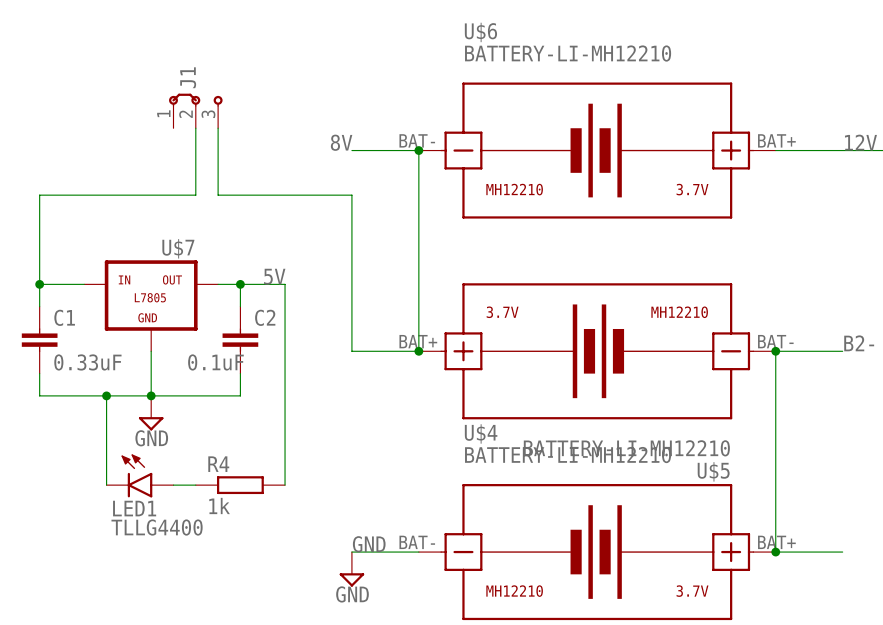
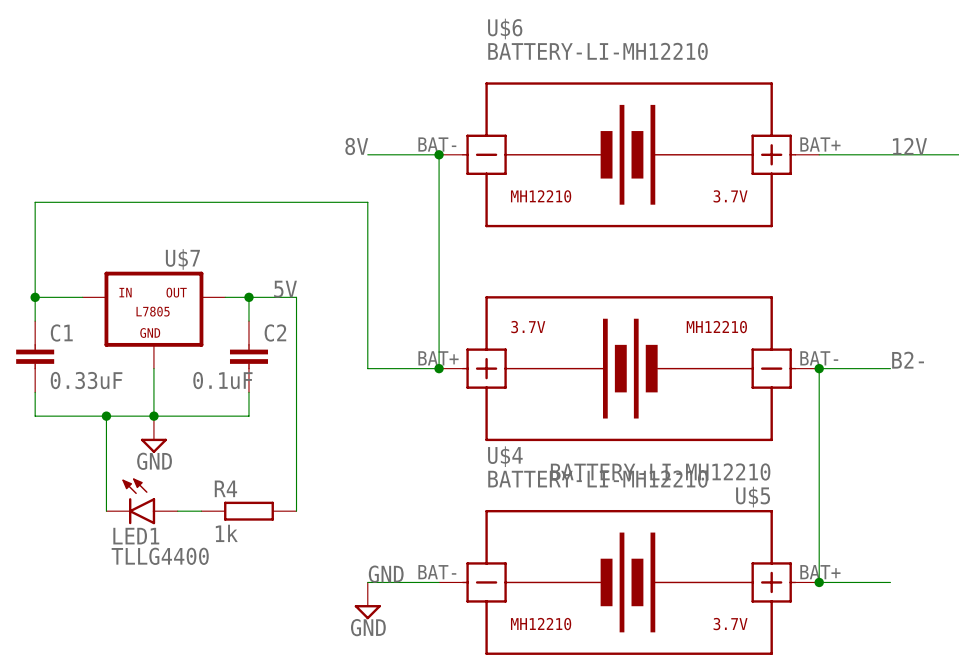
J1: (195, 110) -> none
wire: (195, 128) (195, 195) -> (225, 202) (201, 202)
wire: (218, 128) (218, 195) -> none

